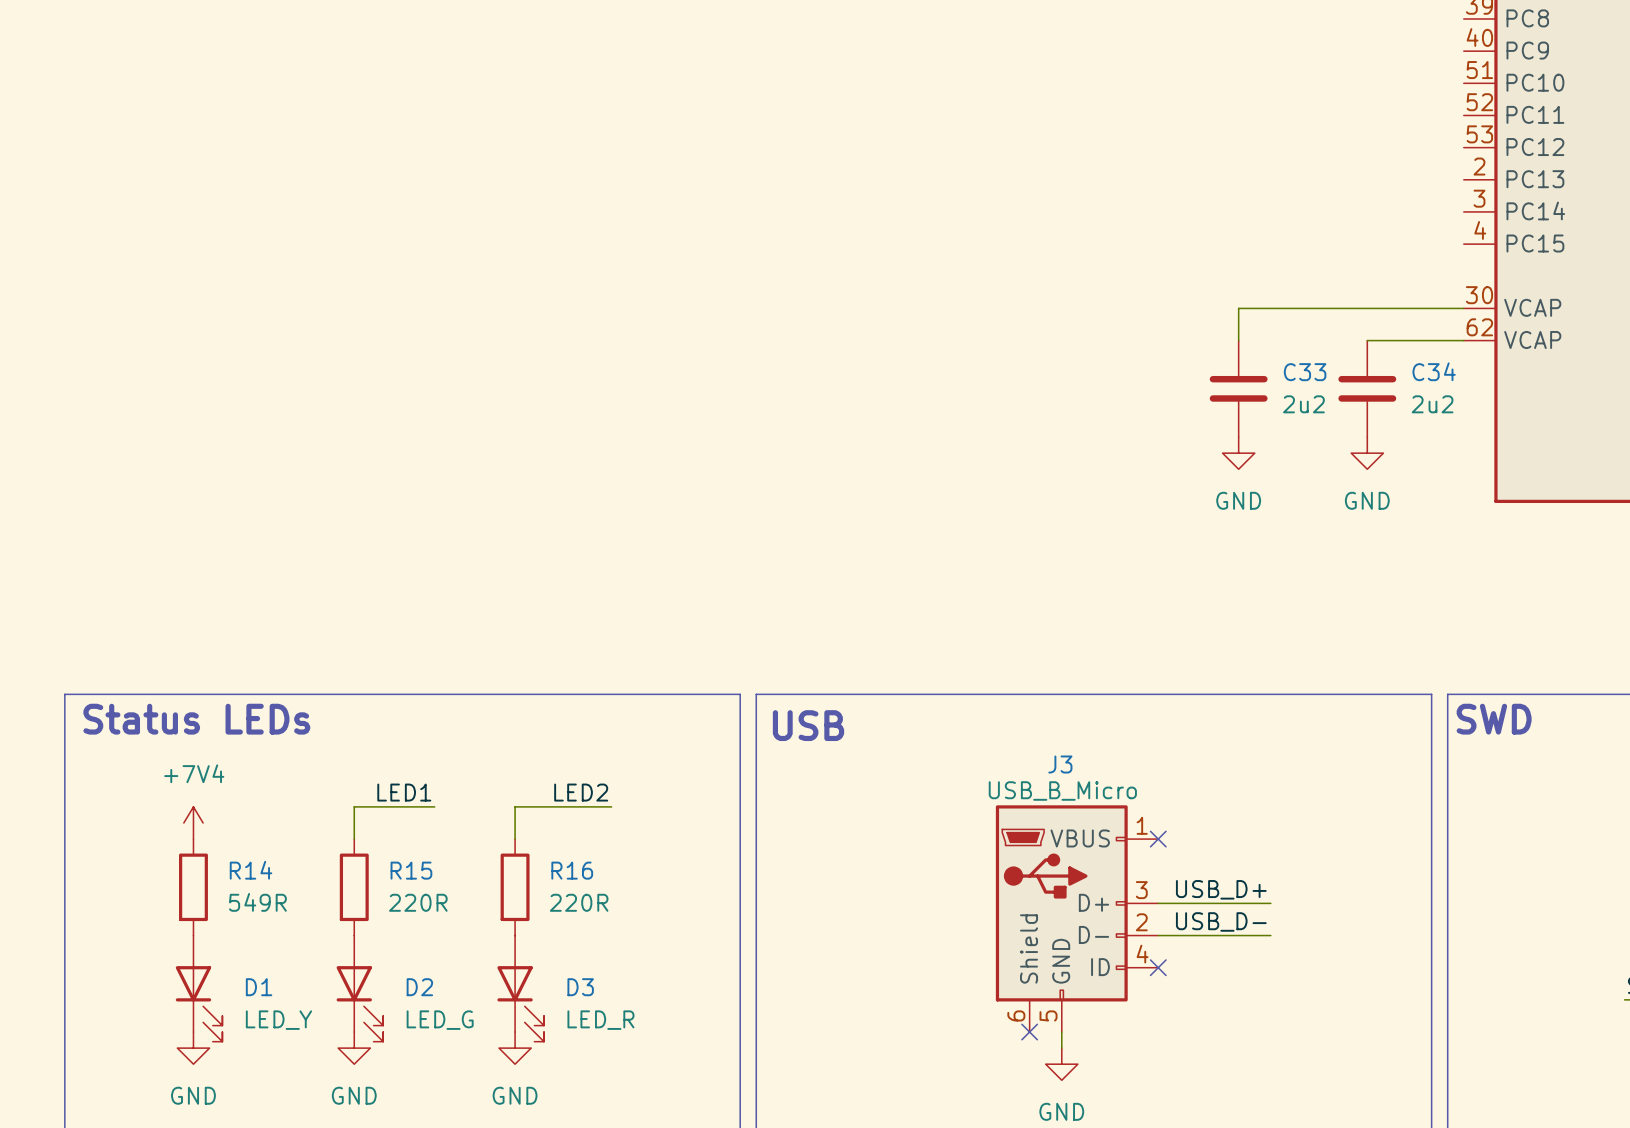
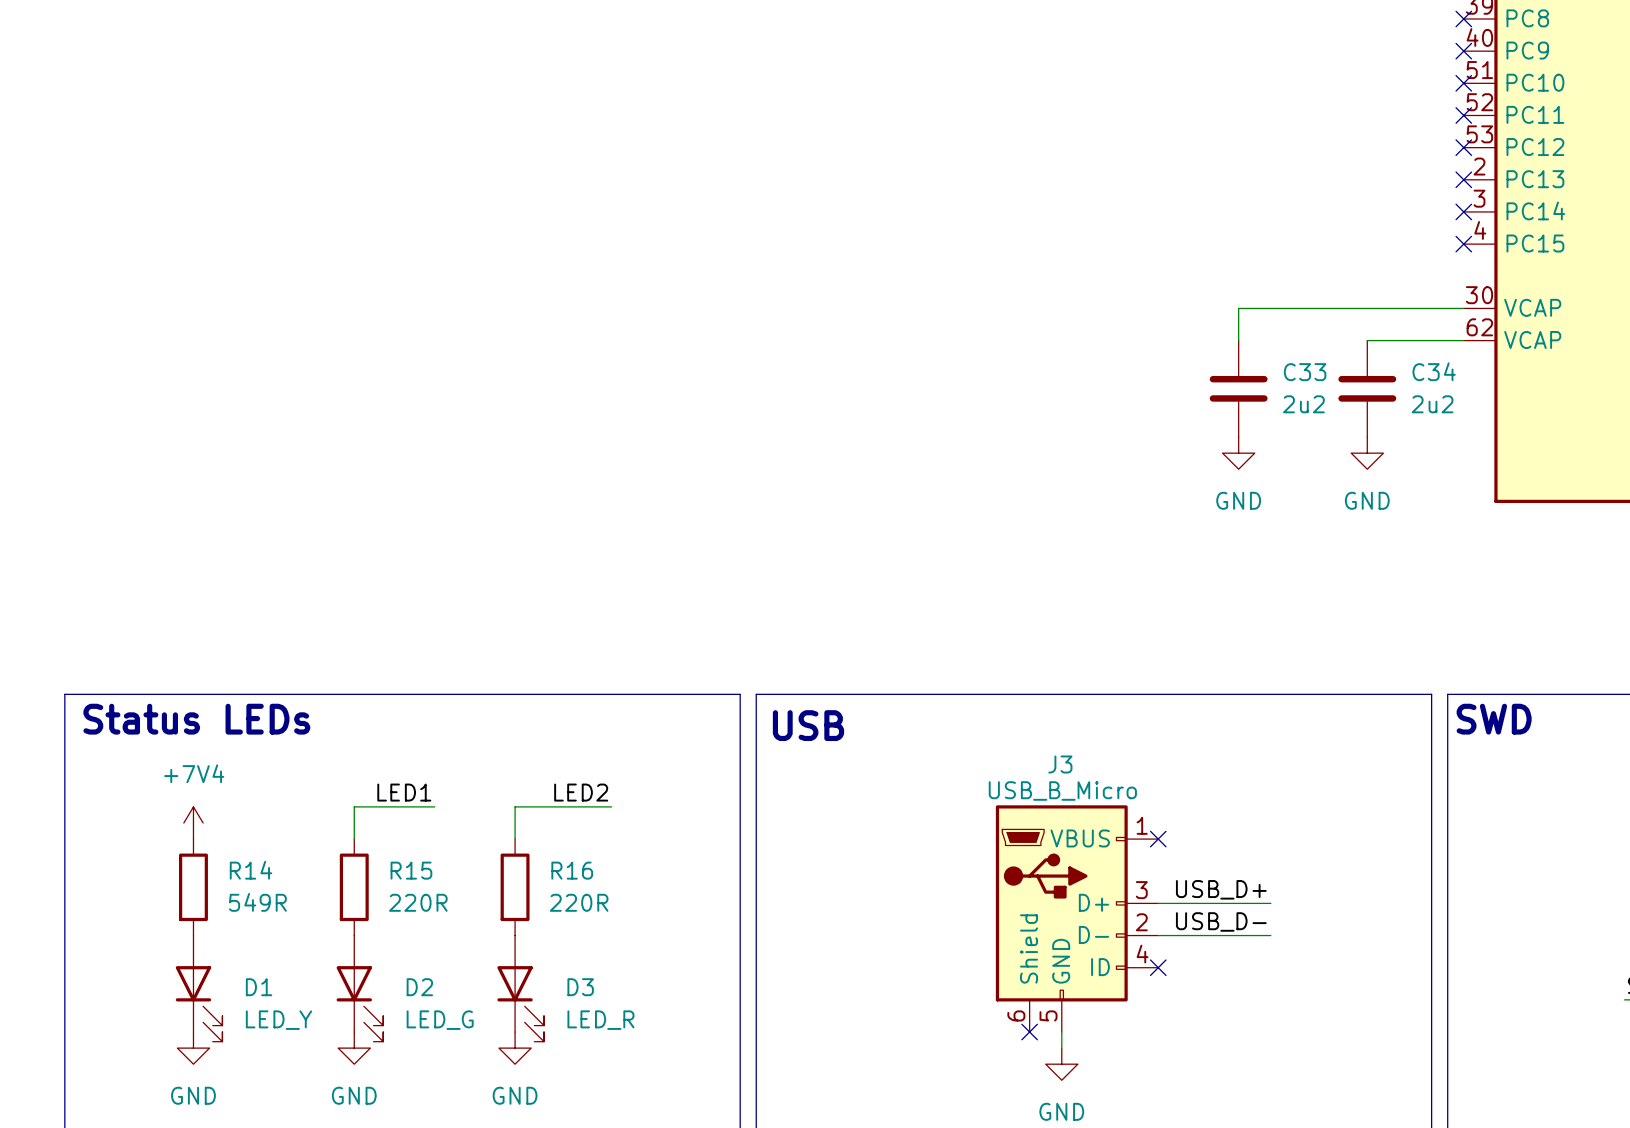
no-connect mark: none -> (1463, 19)
no-connect mark: none -> (1463, 51)
no-connect mark: none -> (1463, 83)
no-connect mark: none -> (1463, 115)
no-connect mark: none -> (1463, 147)
no-connect mark: none -> (1463, 179)
no-connect mark: none -> (1463, 211)
no-connect mark: none -> (1463, 244)

